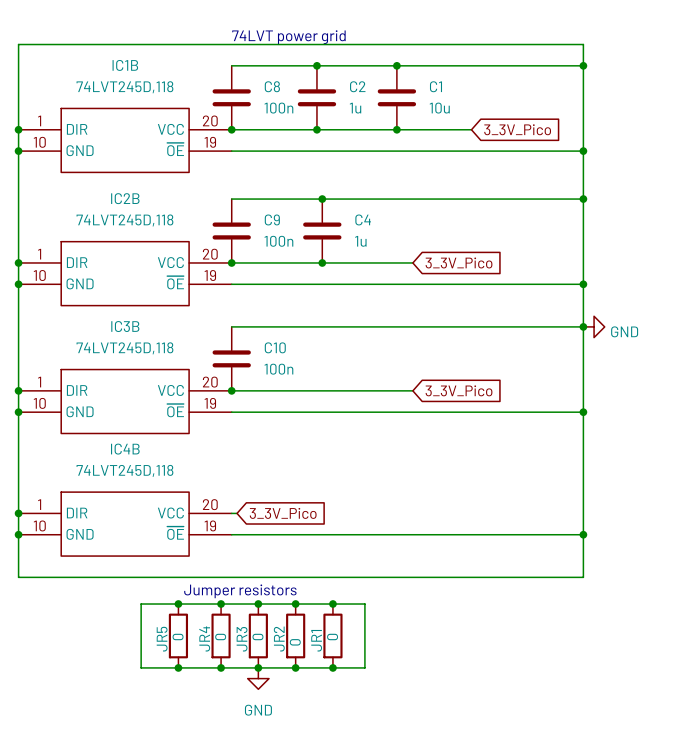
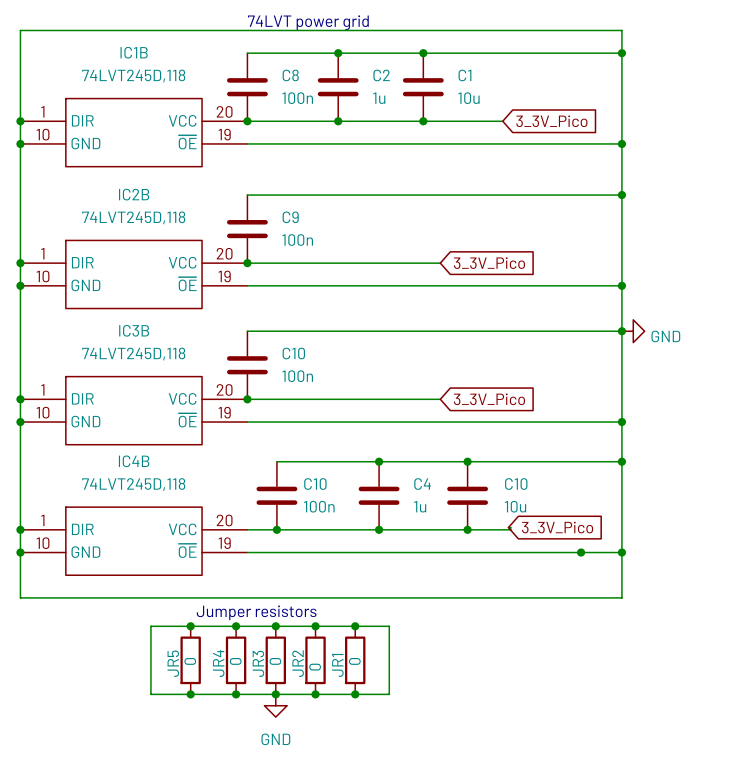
junction: (322, 199) -> none
C4 position: (322, 231) -> (379, 495)
junction: (322, 262) -> none
wire: none -> (276, 461) (621, 461)
junction: none -> (379, 461)
junction: none -> (467, 461)
junction: none -> (621, 461)
C10: none -> 100n (276, 495)
C10: none -> 10u (467, 495)
wire: none -> (508, 527) (510, 527) (510, 529) (253, 529)
global label: none -> 3_3V_Pico (557, 527)
junction: none -> (276, 529)
global label: 3_3V_Pico (283, 513) -> none
junction: none -> (379, 529)
junction: none -> (467, 529)
junction: none -> (581, 552)

